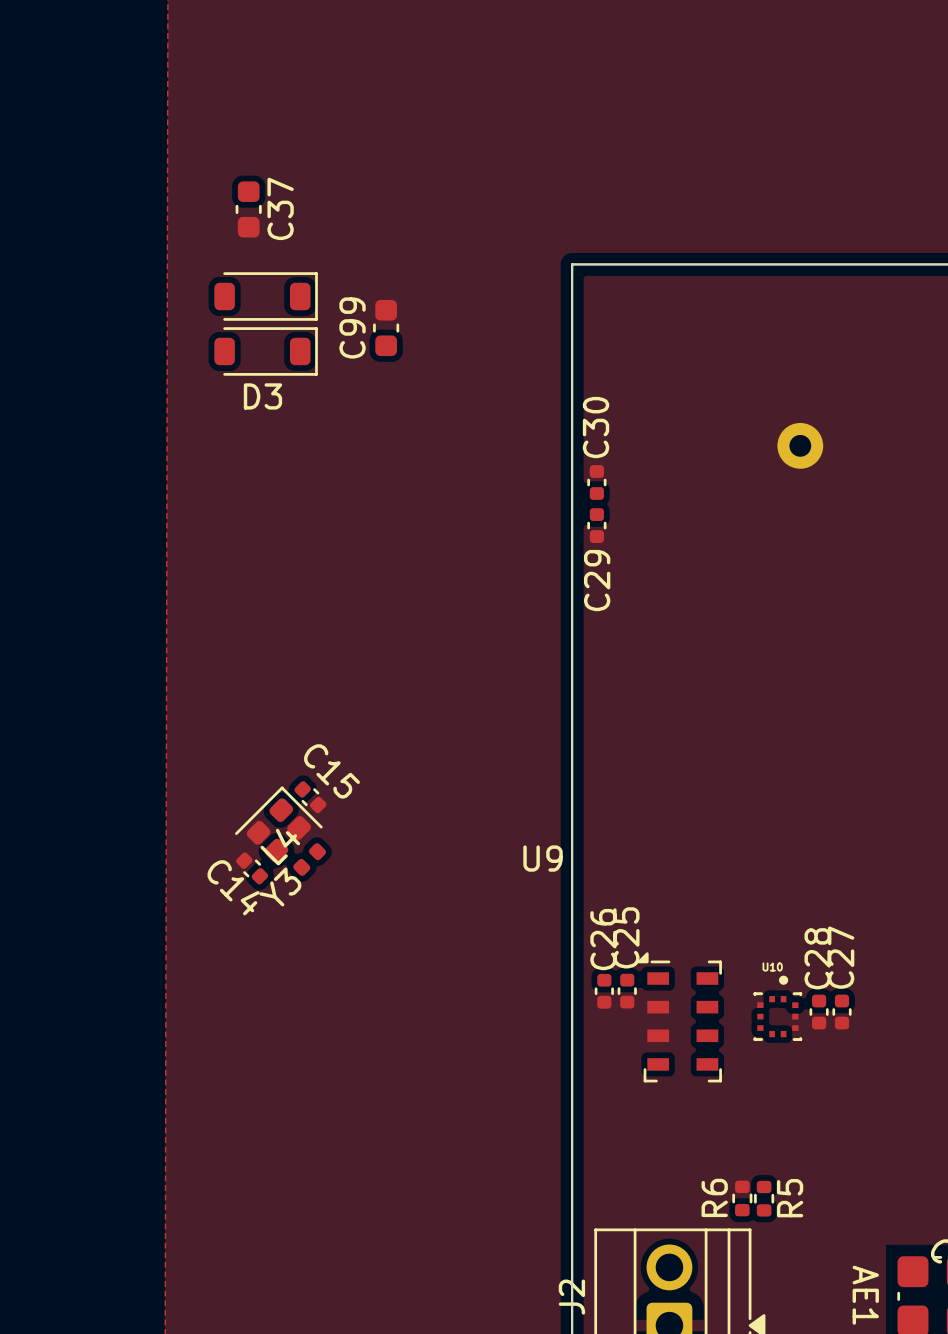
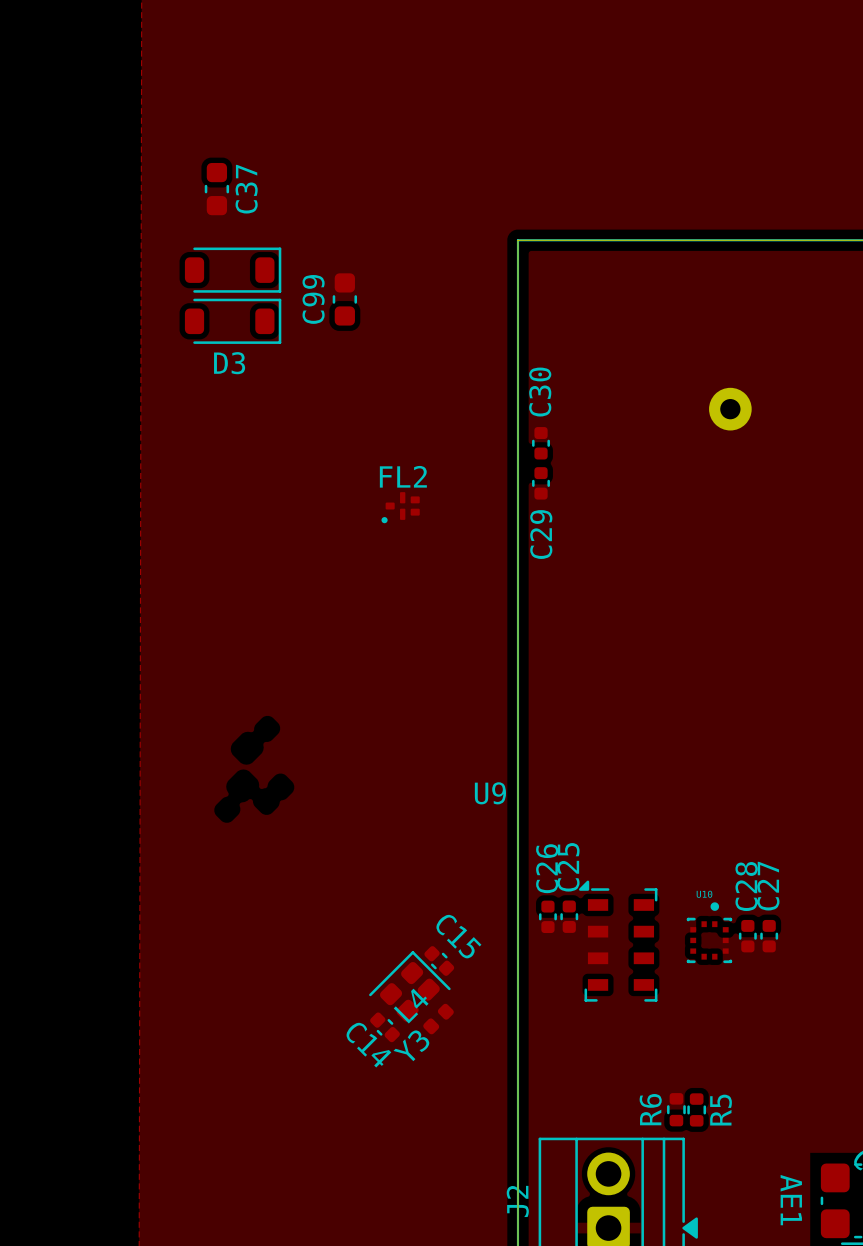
FL2: none -> (400, 507)
C15 position: (310, 797) -> (439, 961)
Y3 position: (278, 824) -> (409, 986)
L4 position: (309, 859) -> (438, 1019)
C14 position: (252, 868) -> (385, 1027)

